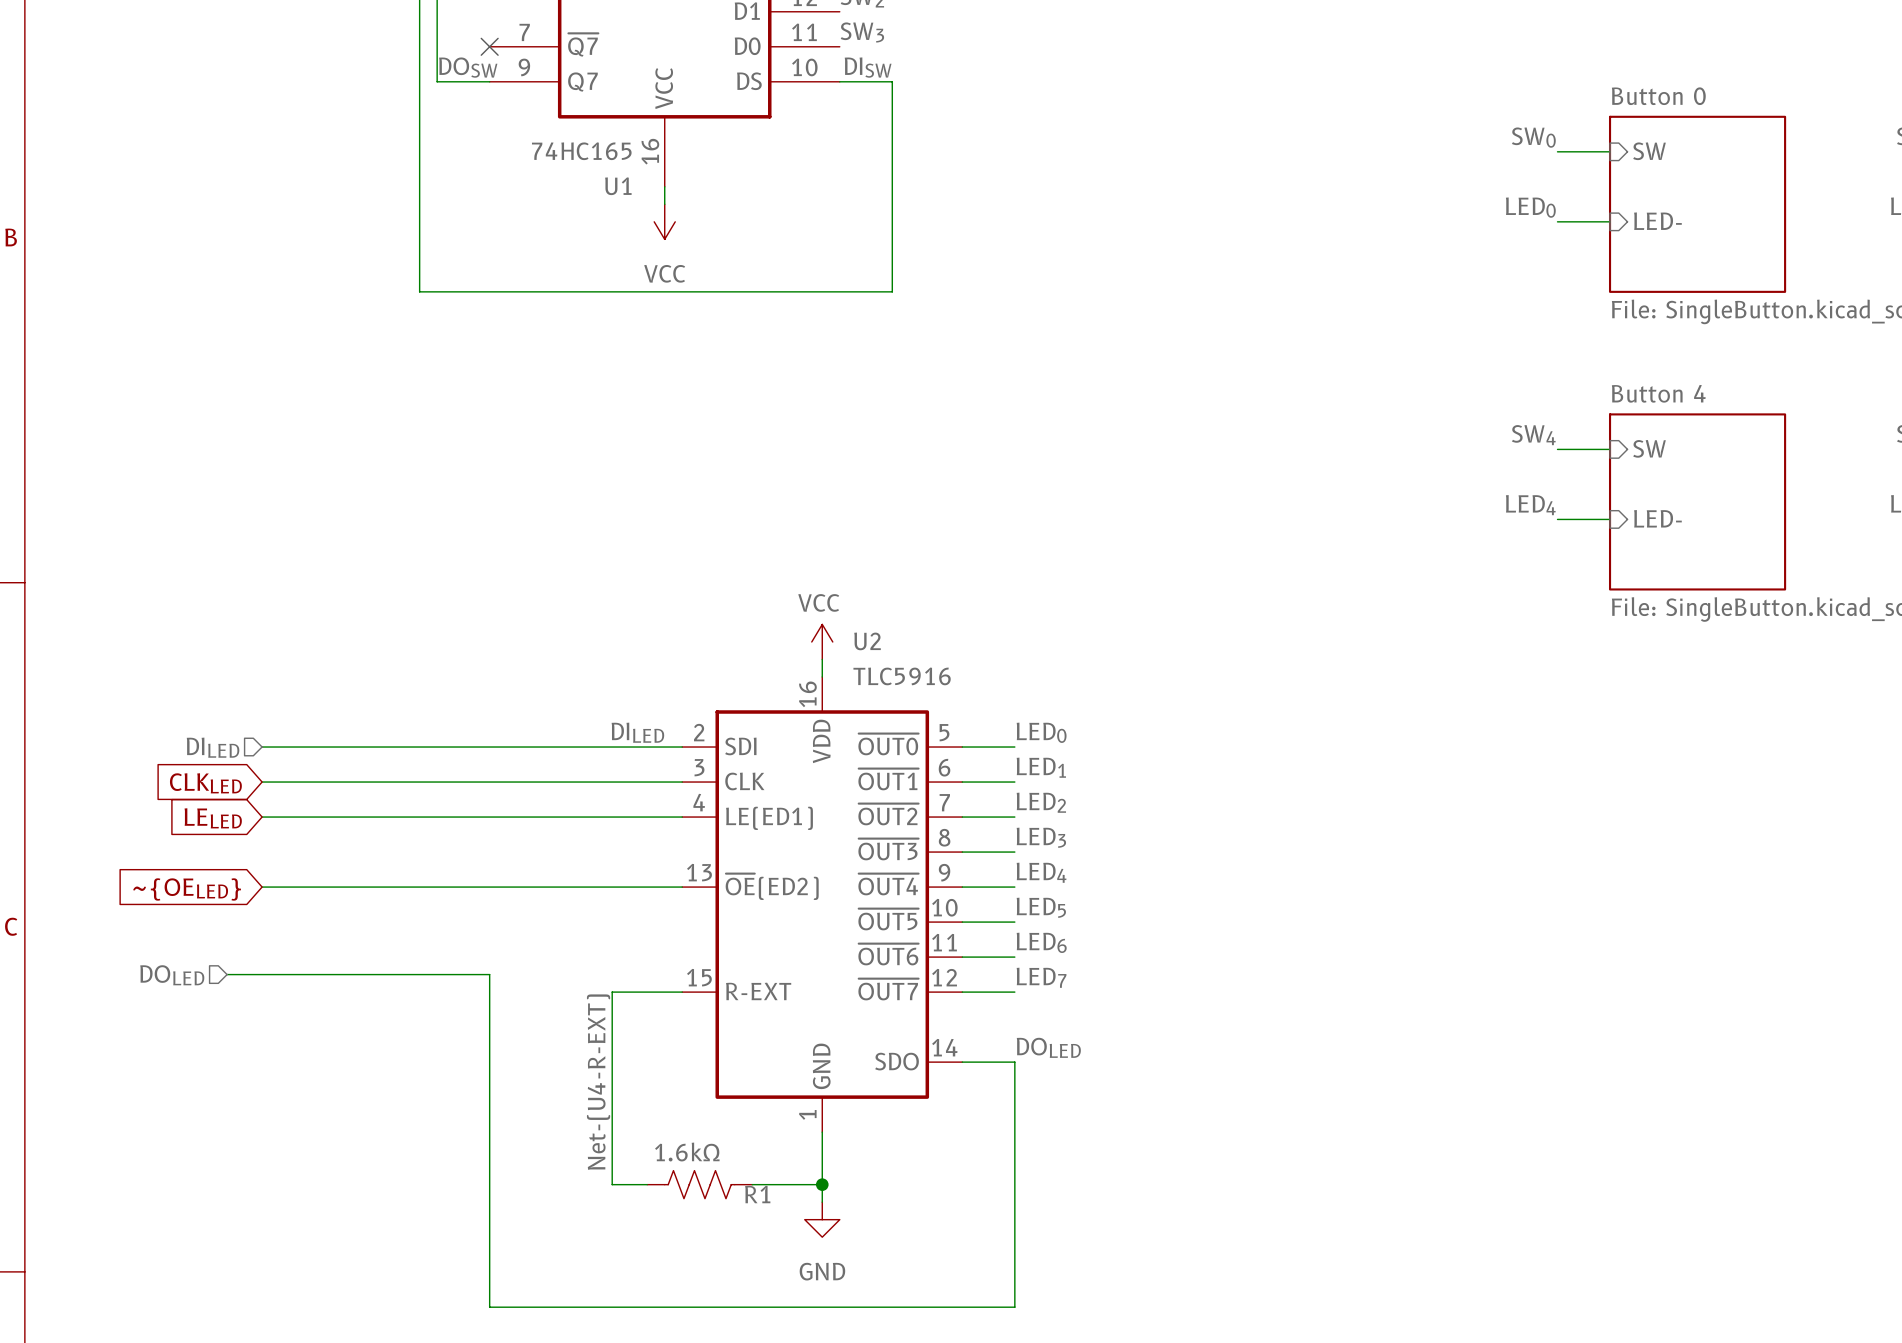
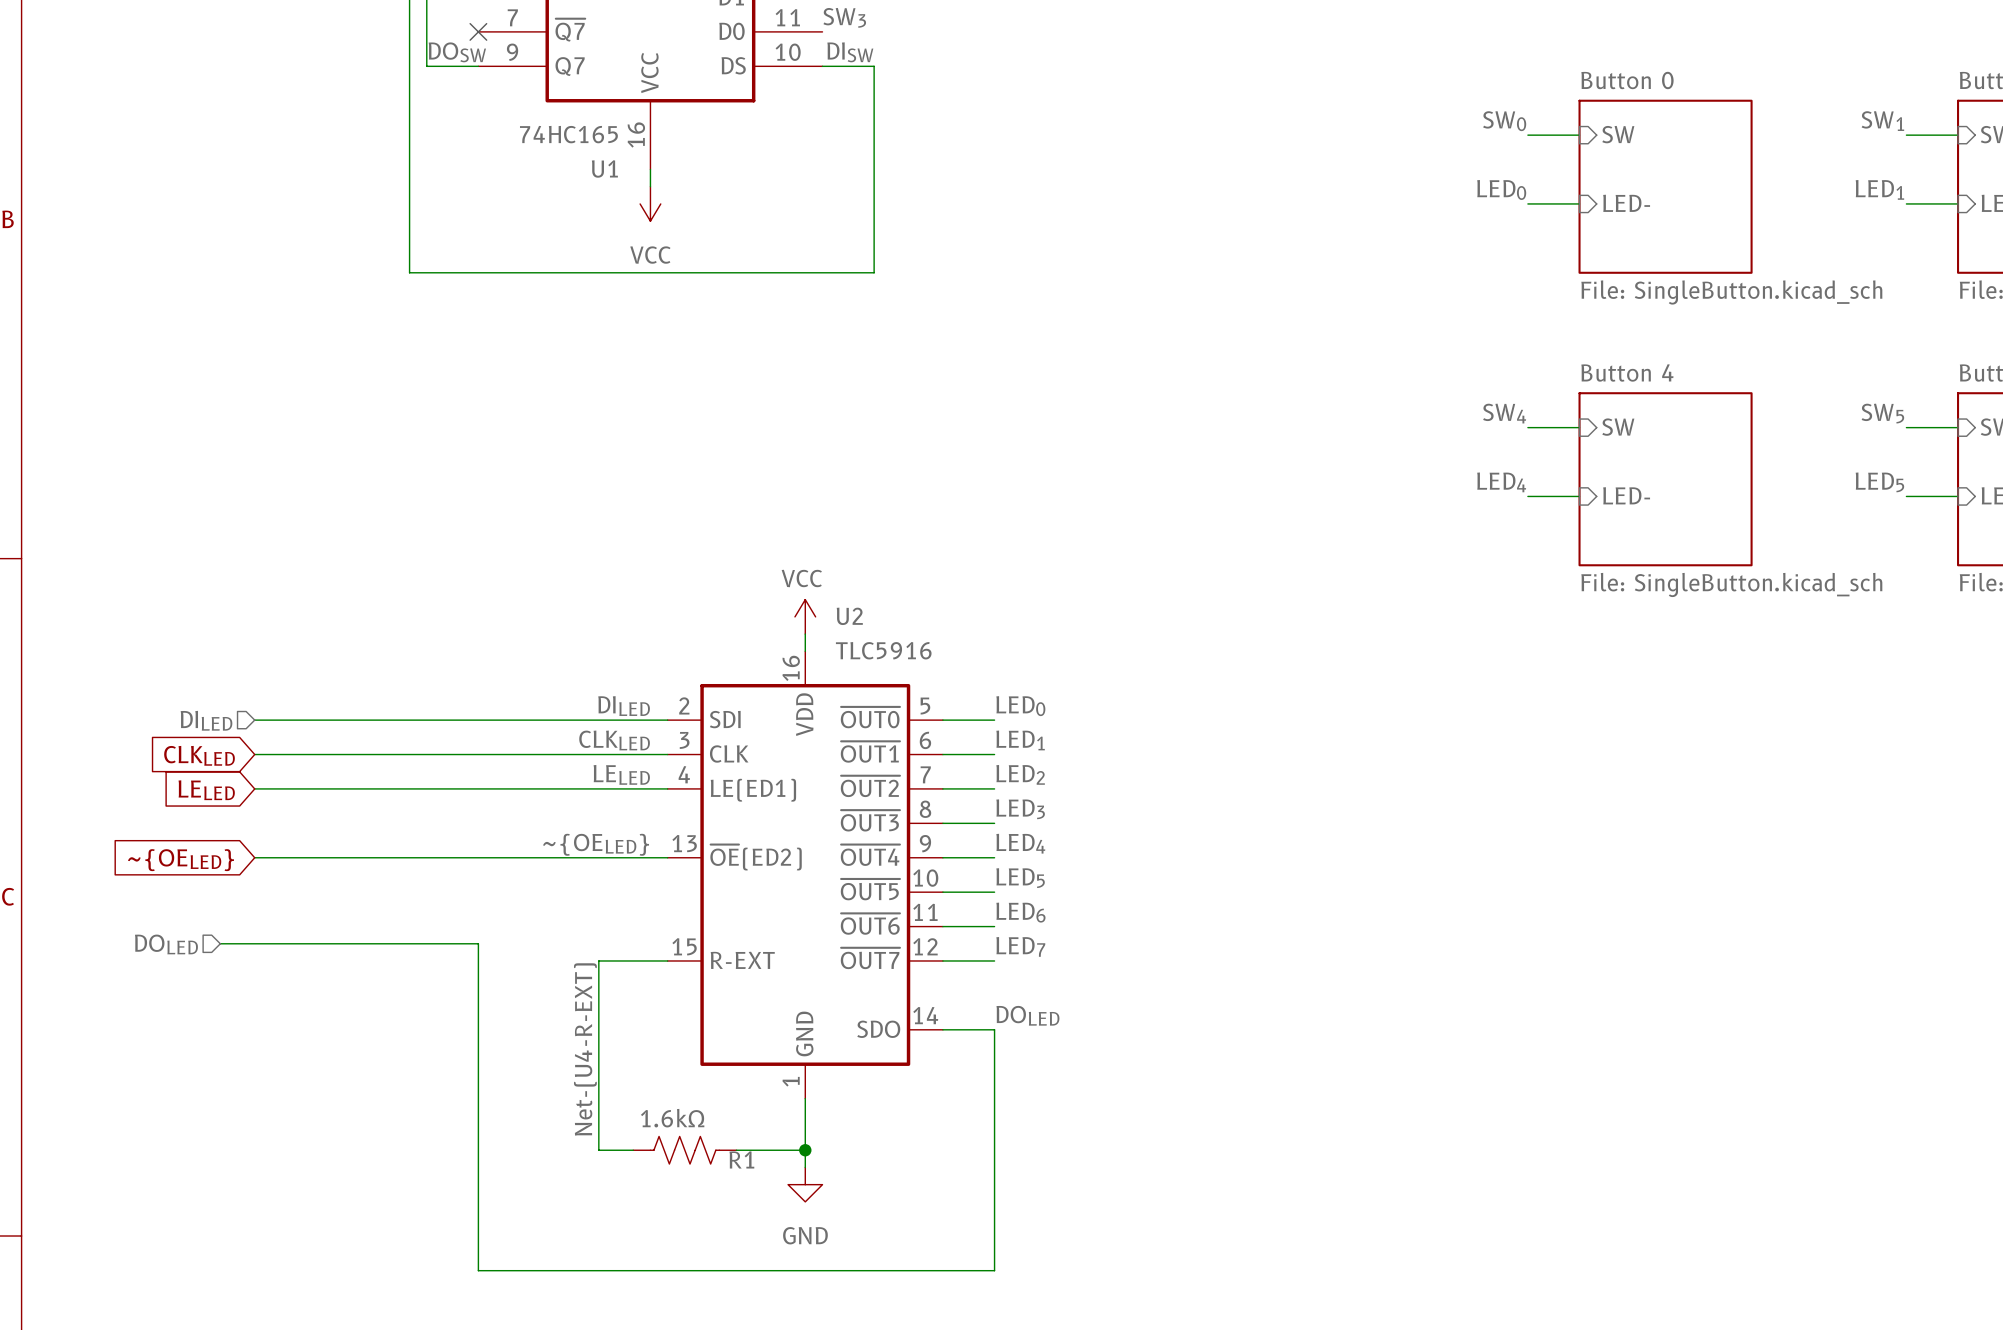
label: none -> CLKLED (614, 740)
label: none -> LELED (621, 774)
label: none -> ~{OELED} (596, 844)

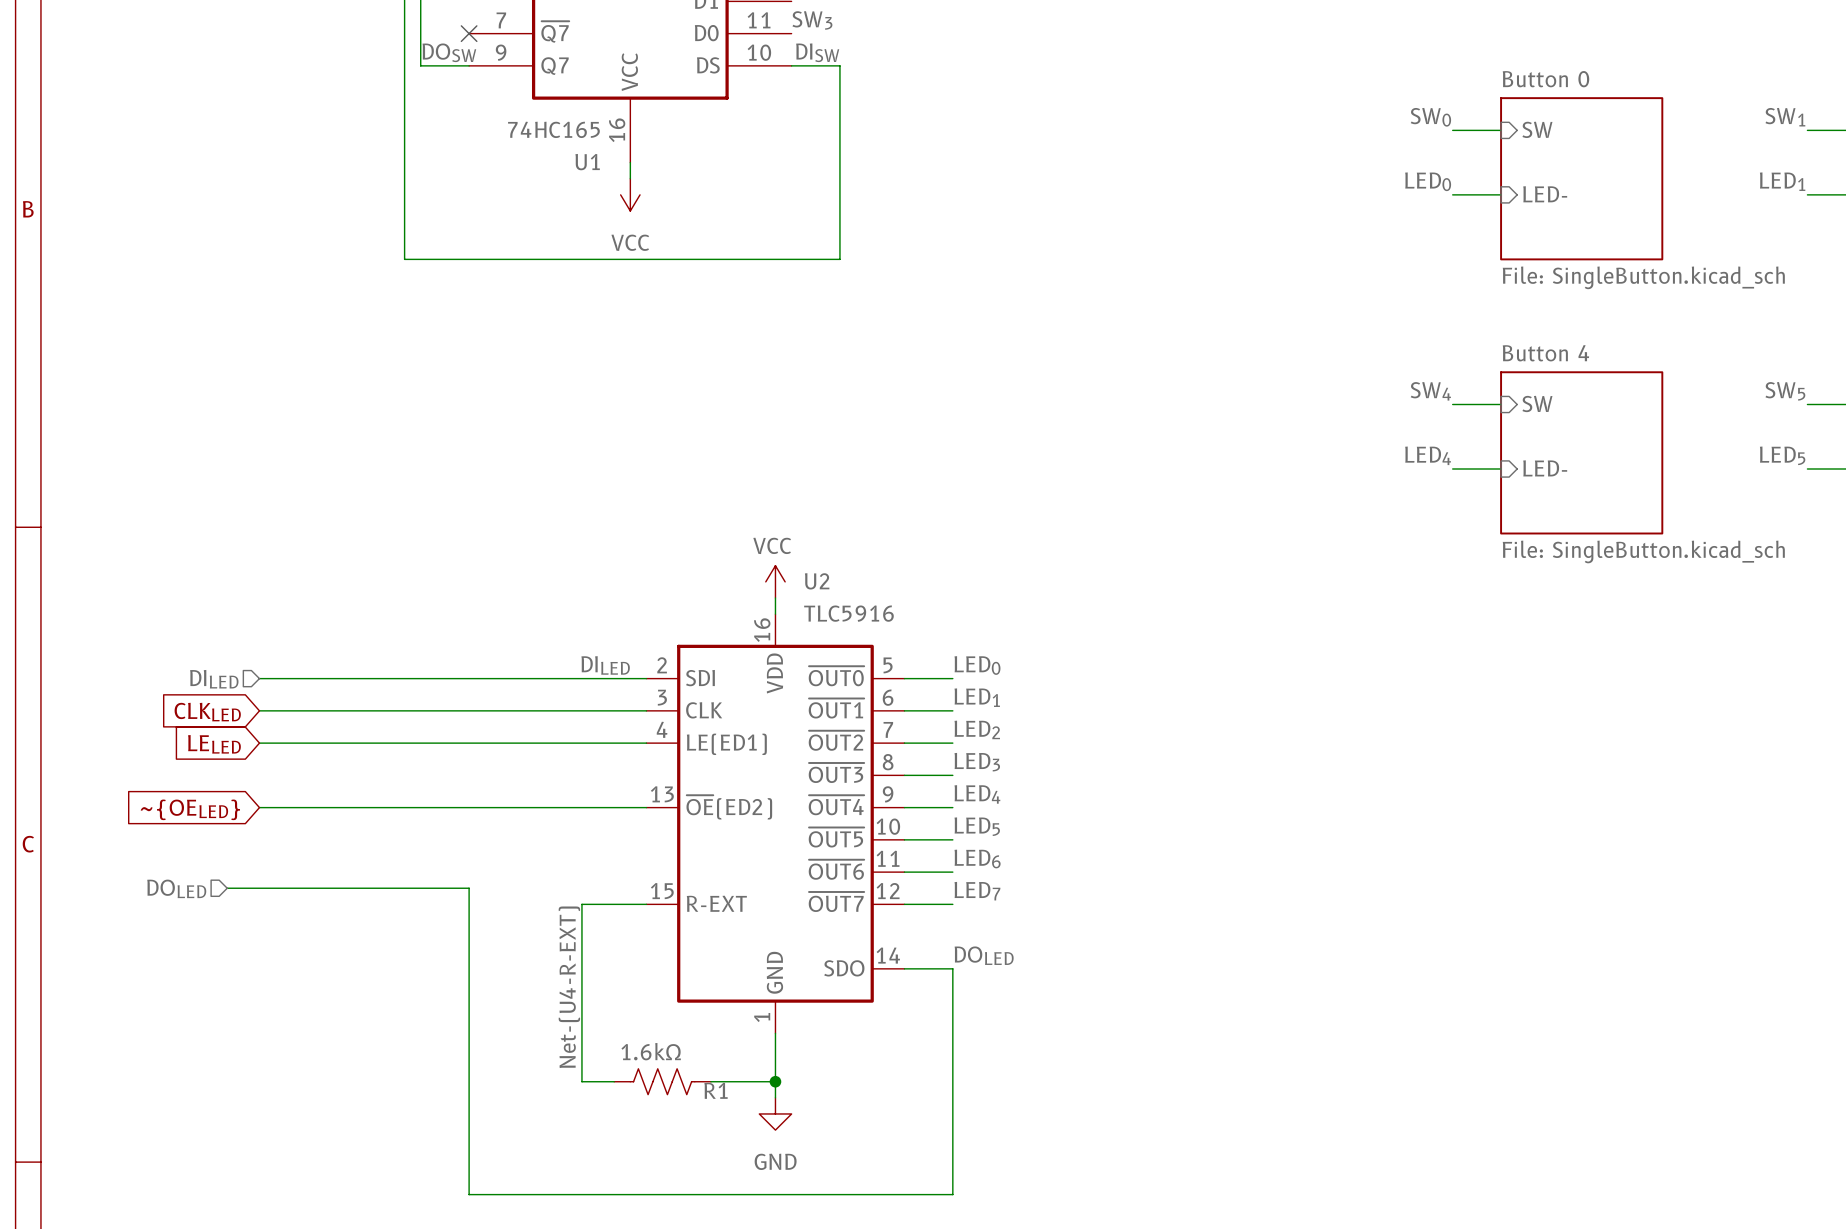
label: CLKLED (614, 740) -> none
label: LELED (621, 774) -> none
label: ~{OELED} (596, 844) -> none

